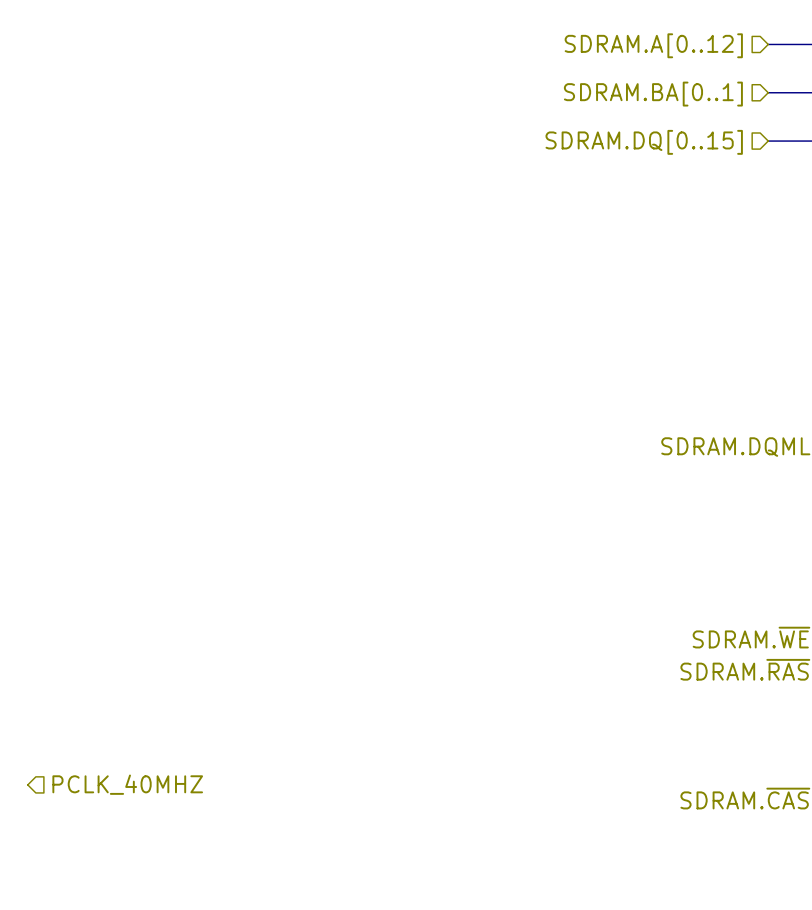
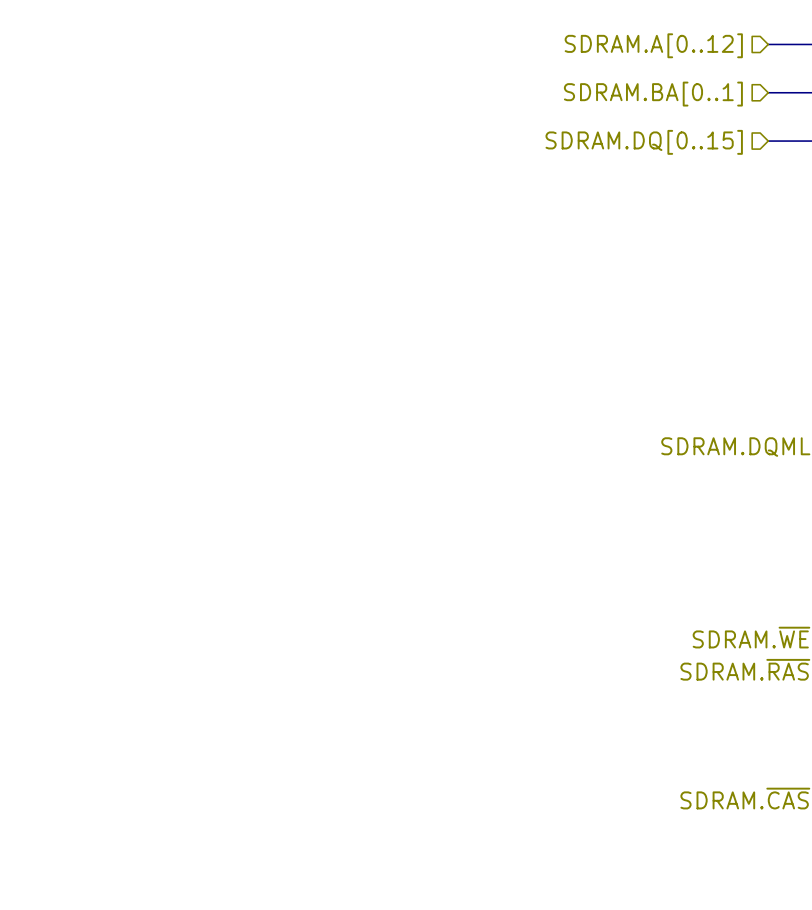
hierarchical label: PCLK_40MHZ (127, 784) -> none

